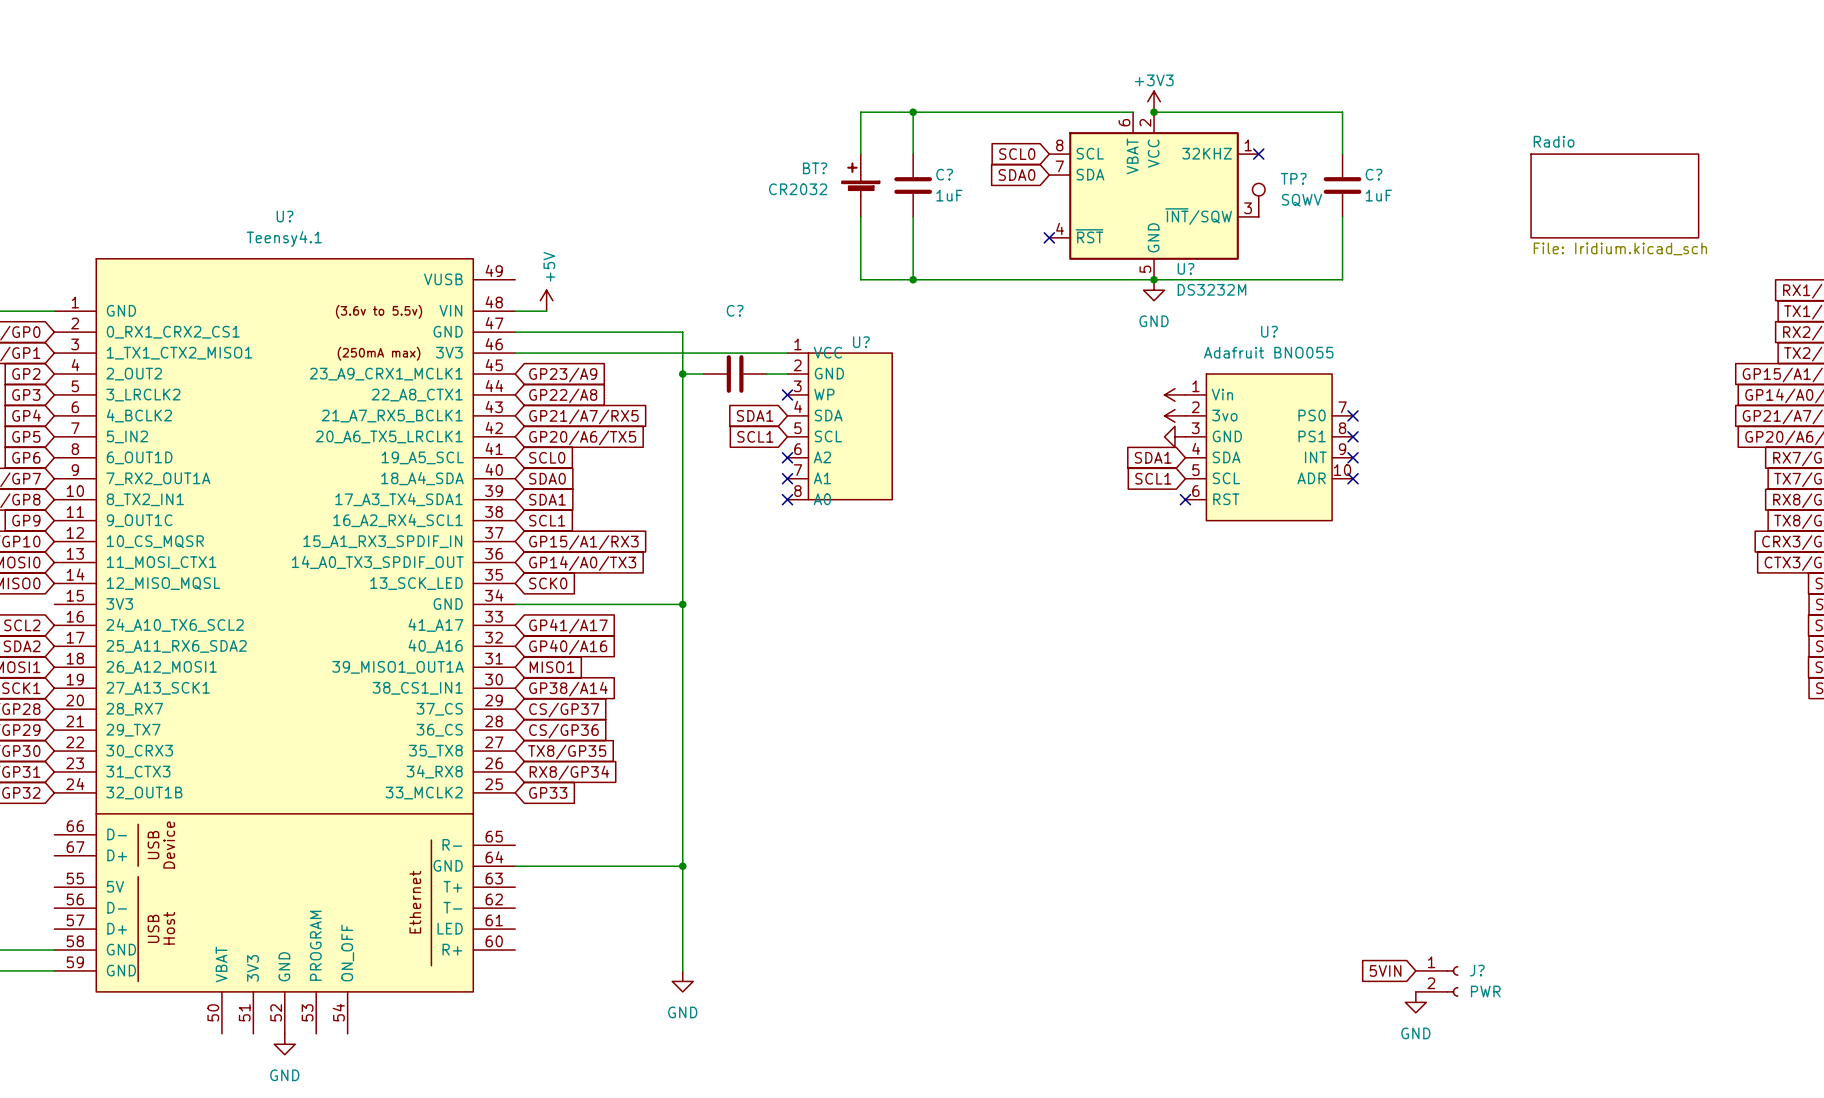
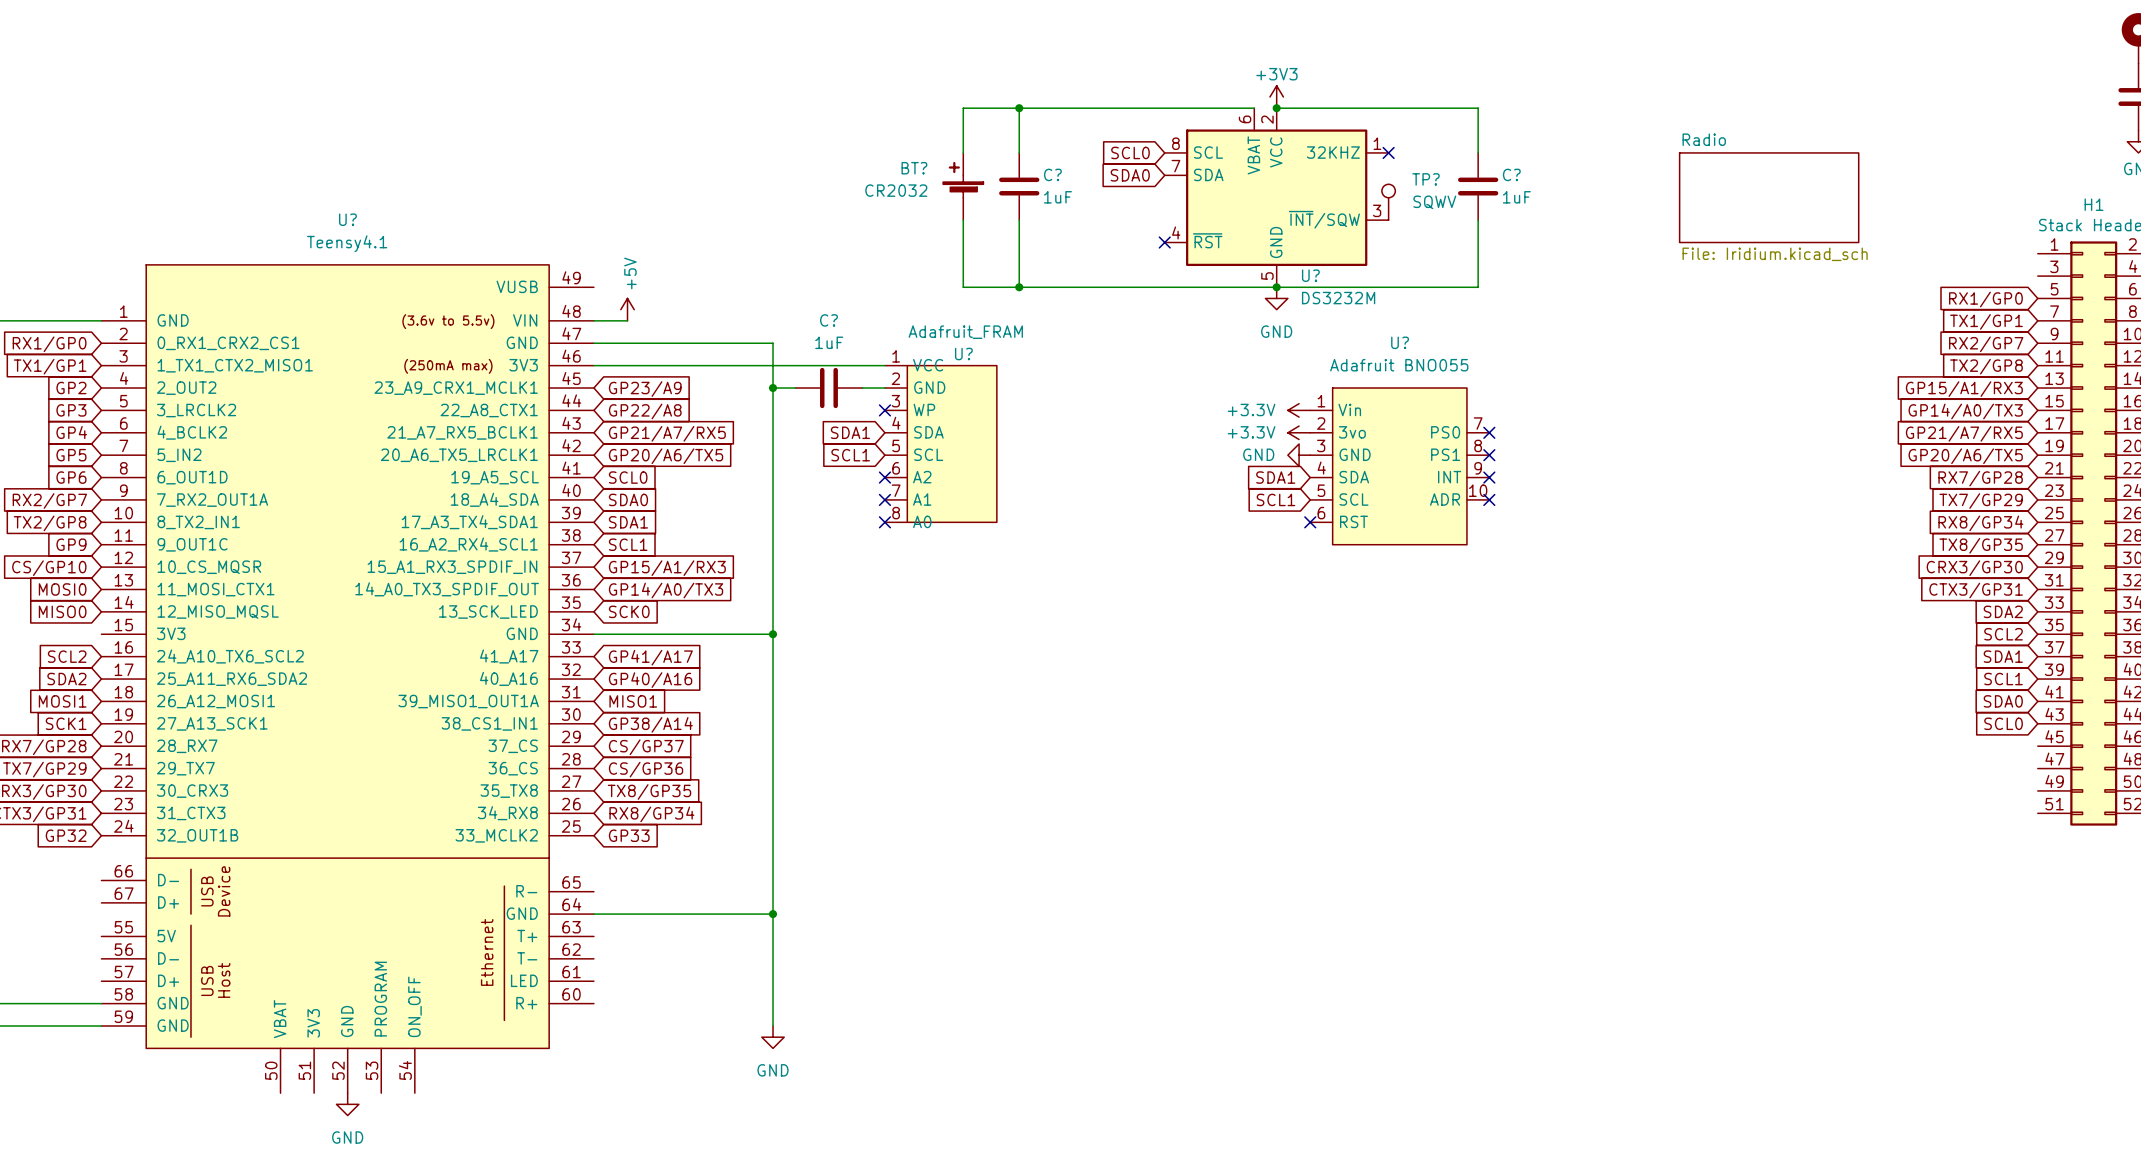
U? value: none -> Adafruit_FRAM (965, 332)
C? value: none -> 1uF (829, 342)
power symbol text: none -> +3.3V (1251, 409)
power symbol text: none -> +3.3V (1251, 432)
power symbol text: none -> GND (1258, 454)
global label: 5VIN (1385, 970) -> none
J?: PWR (1437, 981) -> none
power symbol: GND (1415, 1002) -> none

